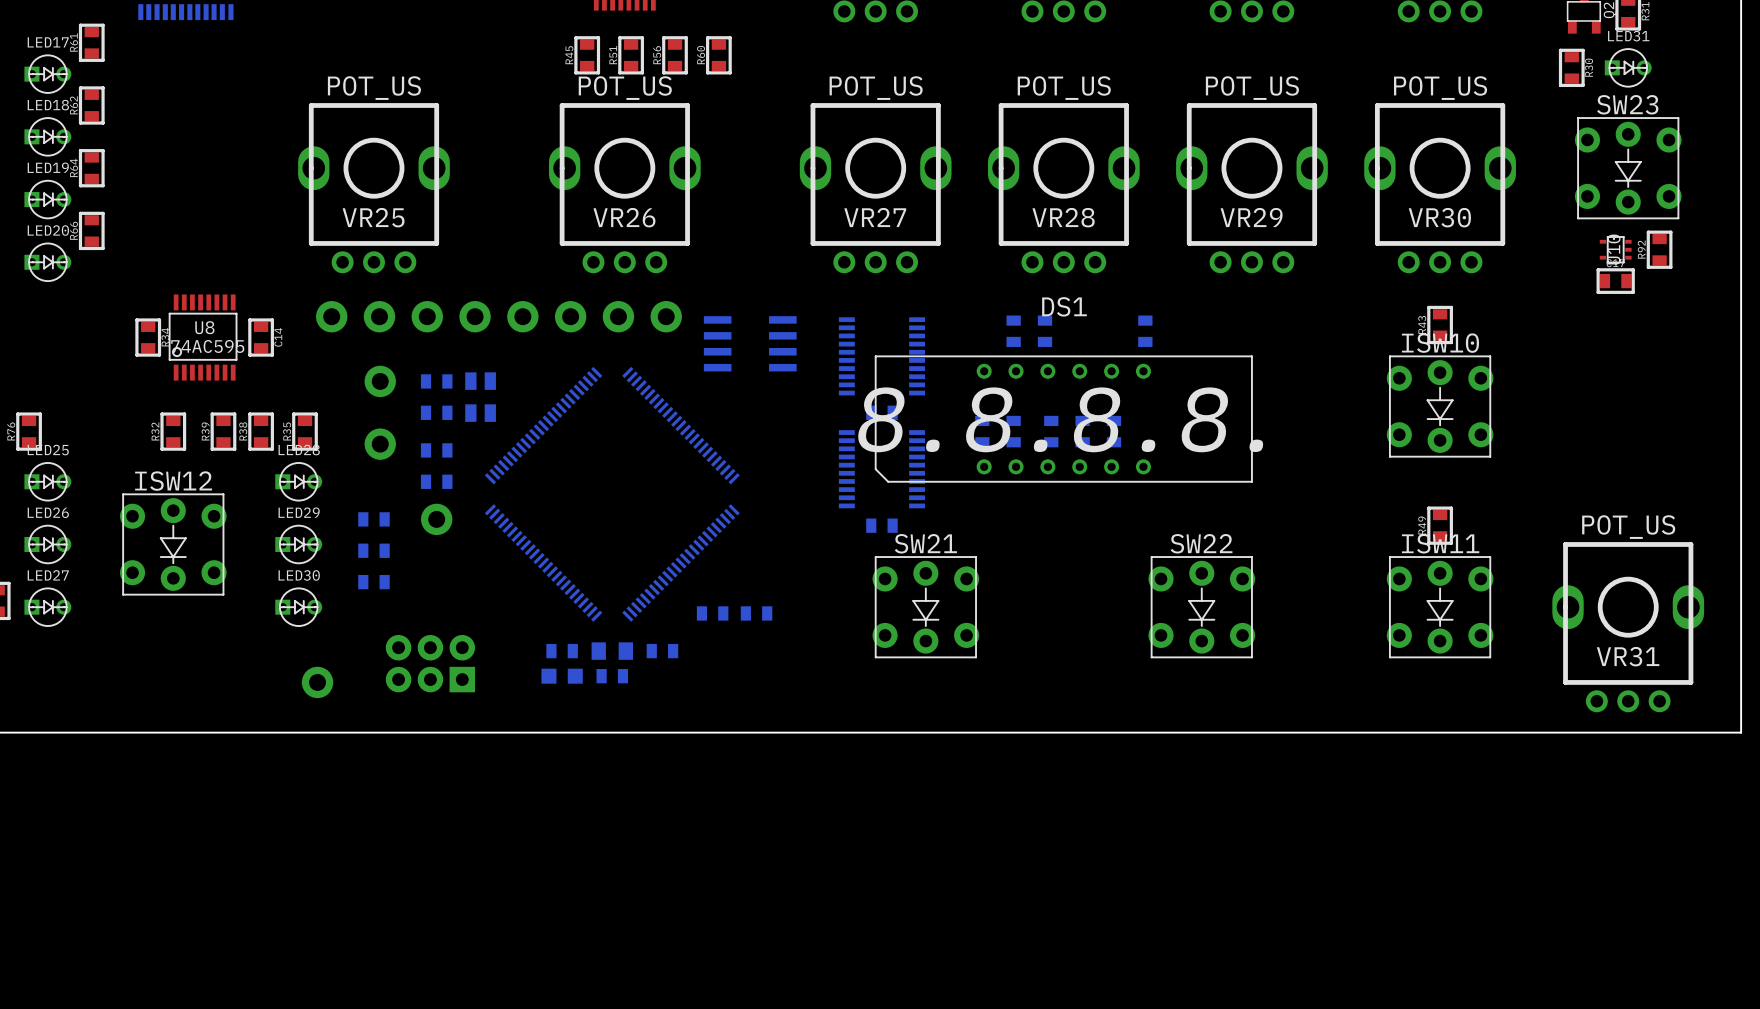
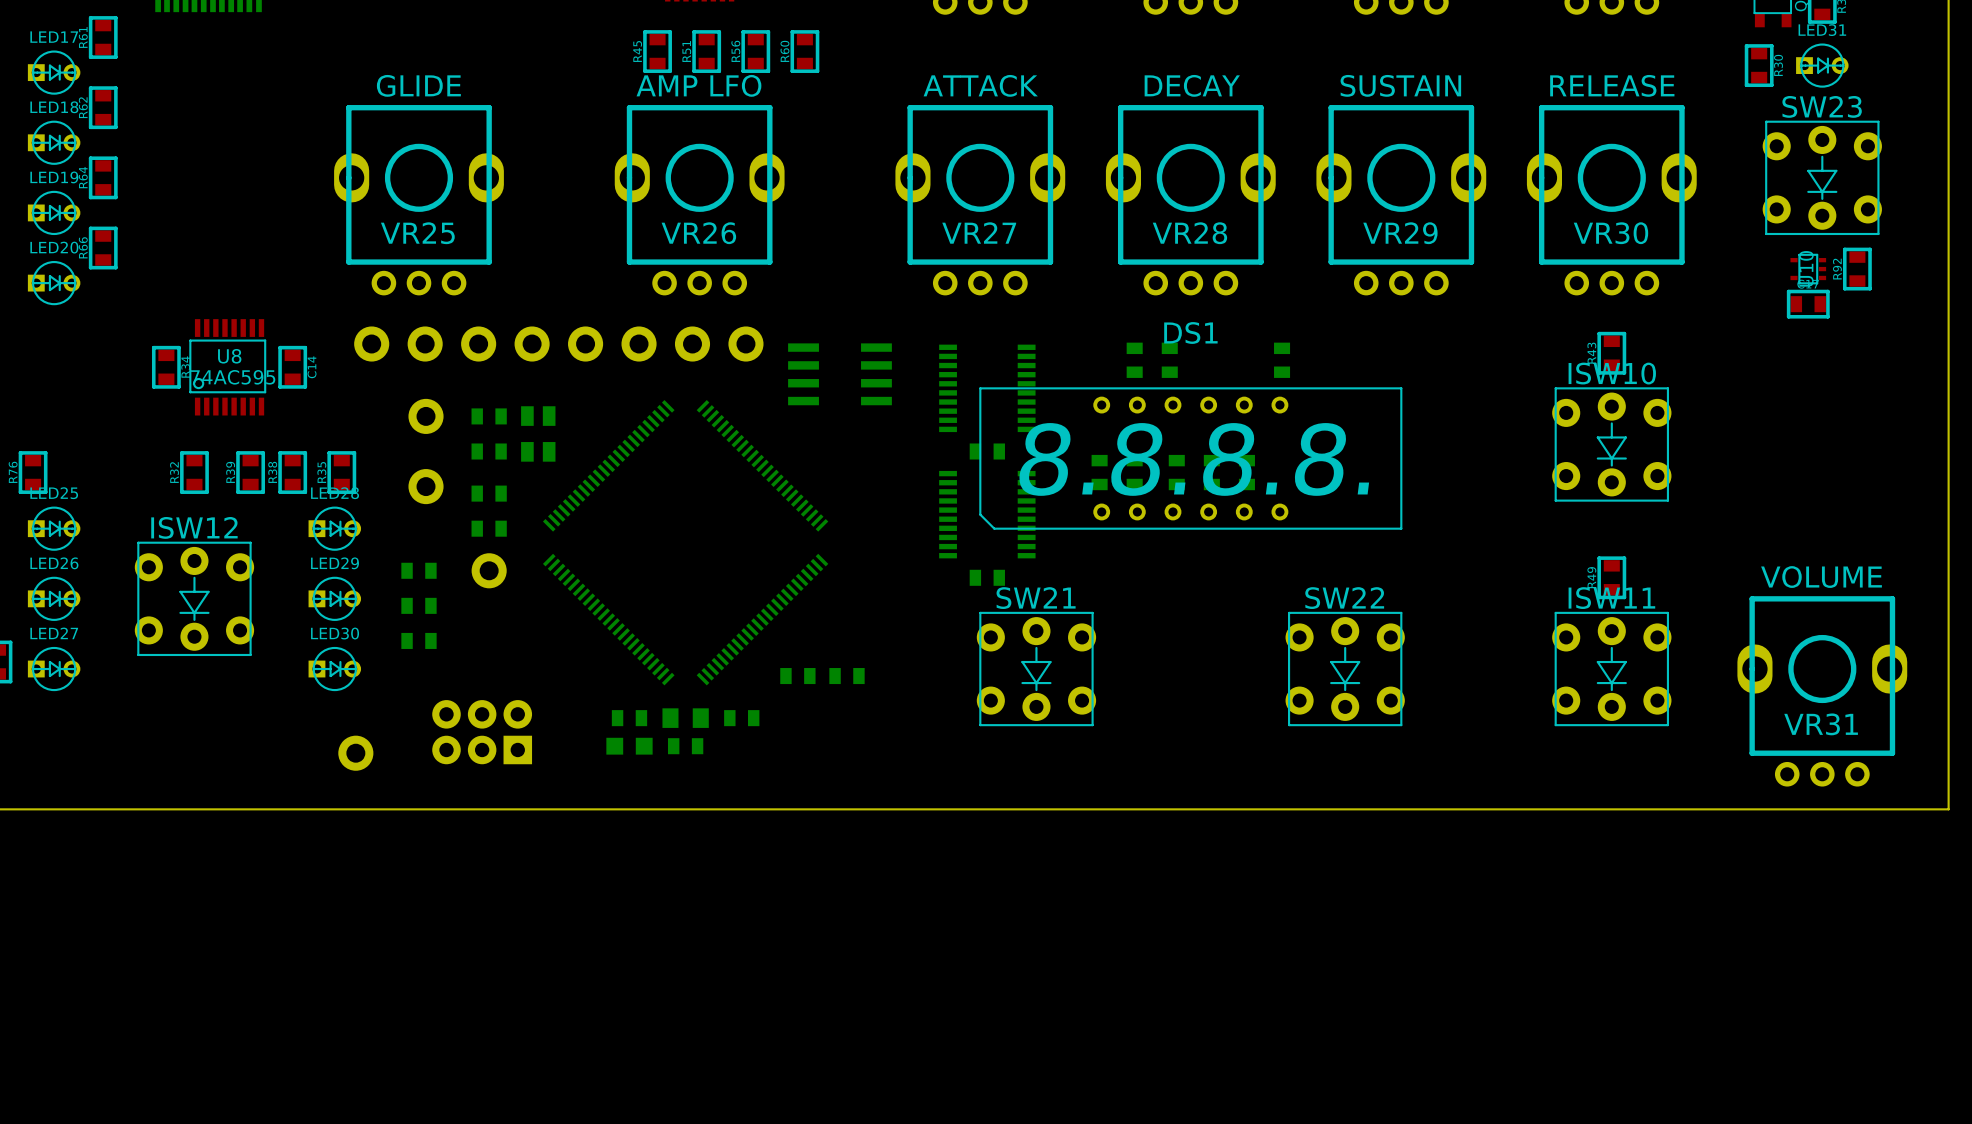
VR25 value: POT_US (374, 88) -> GLIDE (418, 85)
VR26 value: POT_US (625, 88) -> AMP LFO (698, 85)
VR27 value: POT_US (876, 88) -> ATTACK (980, 85)
VR28 value: POT_US (1064, 88) -> DECAY (1192, 85)
VR29 value: POT_US (1252, 88) -> SUSTAIN (1400, 85)
VR30 value: POT_US (1440, 88) -> RELEASE (1612, 85)
VR31 value: POT_US (1628, 527) -> VOLUME (1821, 577)

